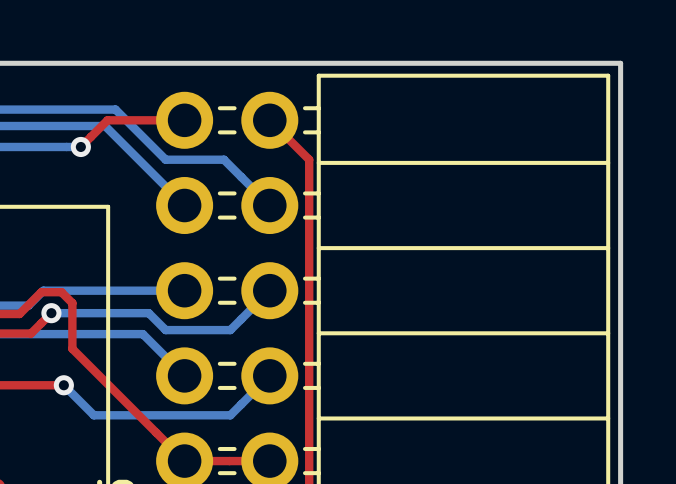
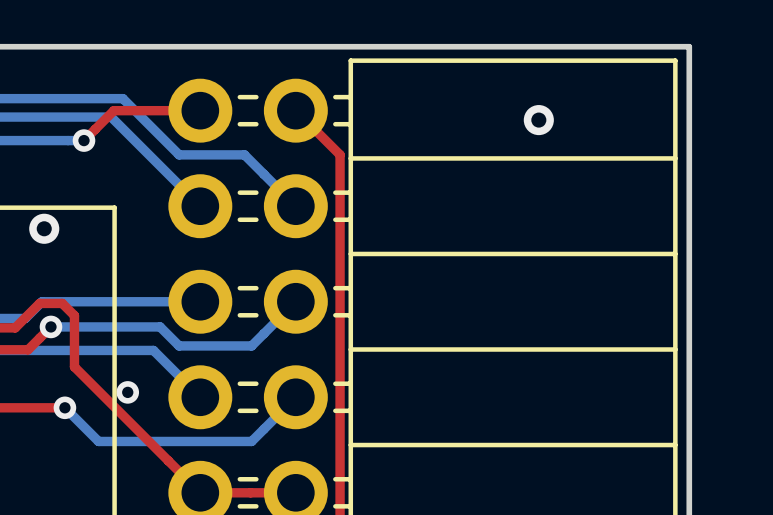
via: none -> (538, 120)
via: none -> (44, 228)
via: none -> (127, 392)

